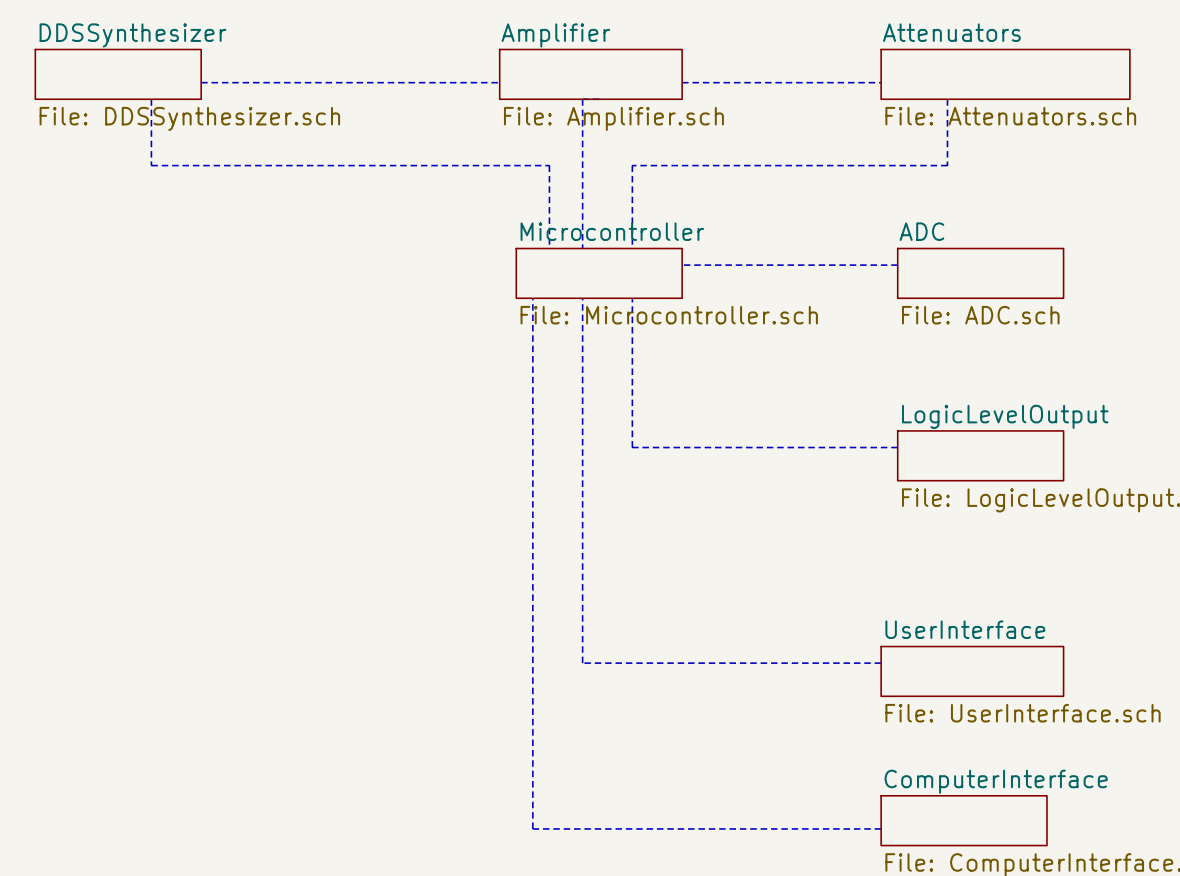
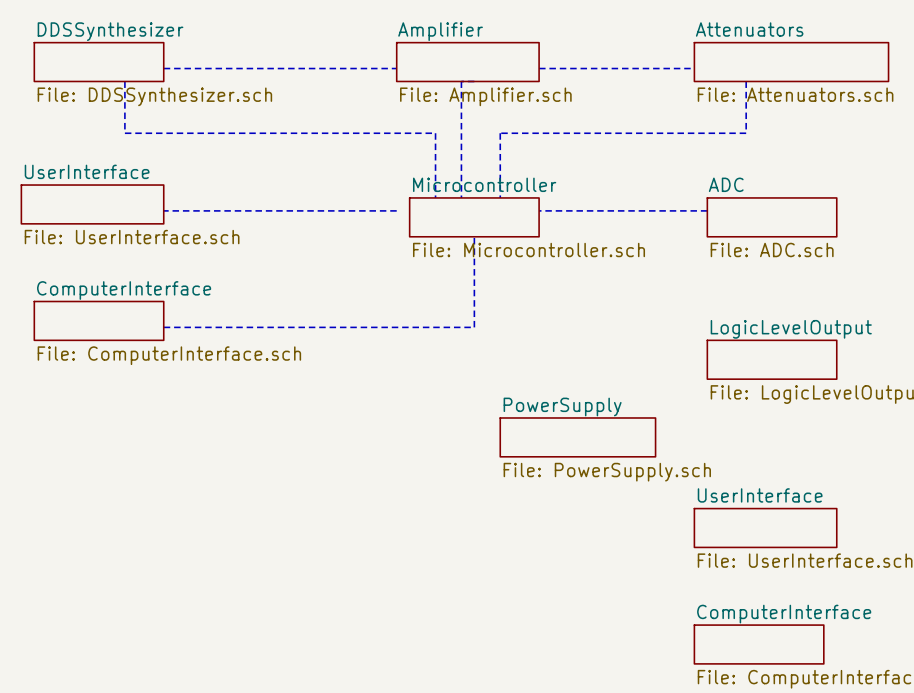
sheet UserInterface: none -> File: UserInterface.sch (92, 204)
line: none -> (163, 210) (396, 210)
line: (532, 298) (532, 828) (881, 828) -> none
line: (582, 298) (582, 663) (881, 663) -> none
line: none -> (474, 236) (474, 327) (163, 327)
line: (632, 298) (632, 447) (897, 447) -> none
sheet ComputerInterface: none -> File: ComputerInterface.sch (99, 320)
sheet PowerSupply: none -> File: PowerSupply.sch (577, 437)

